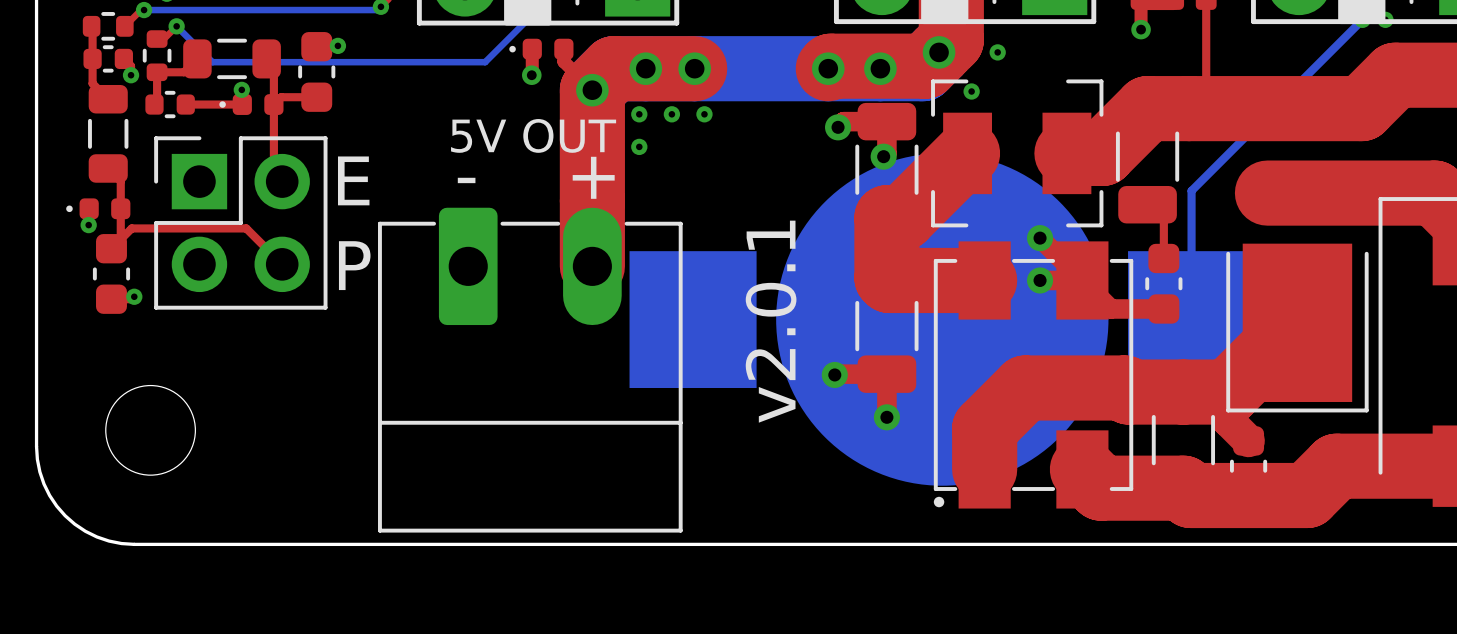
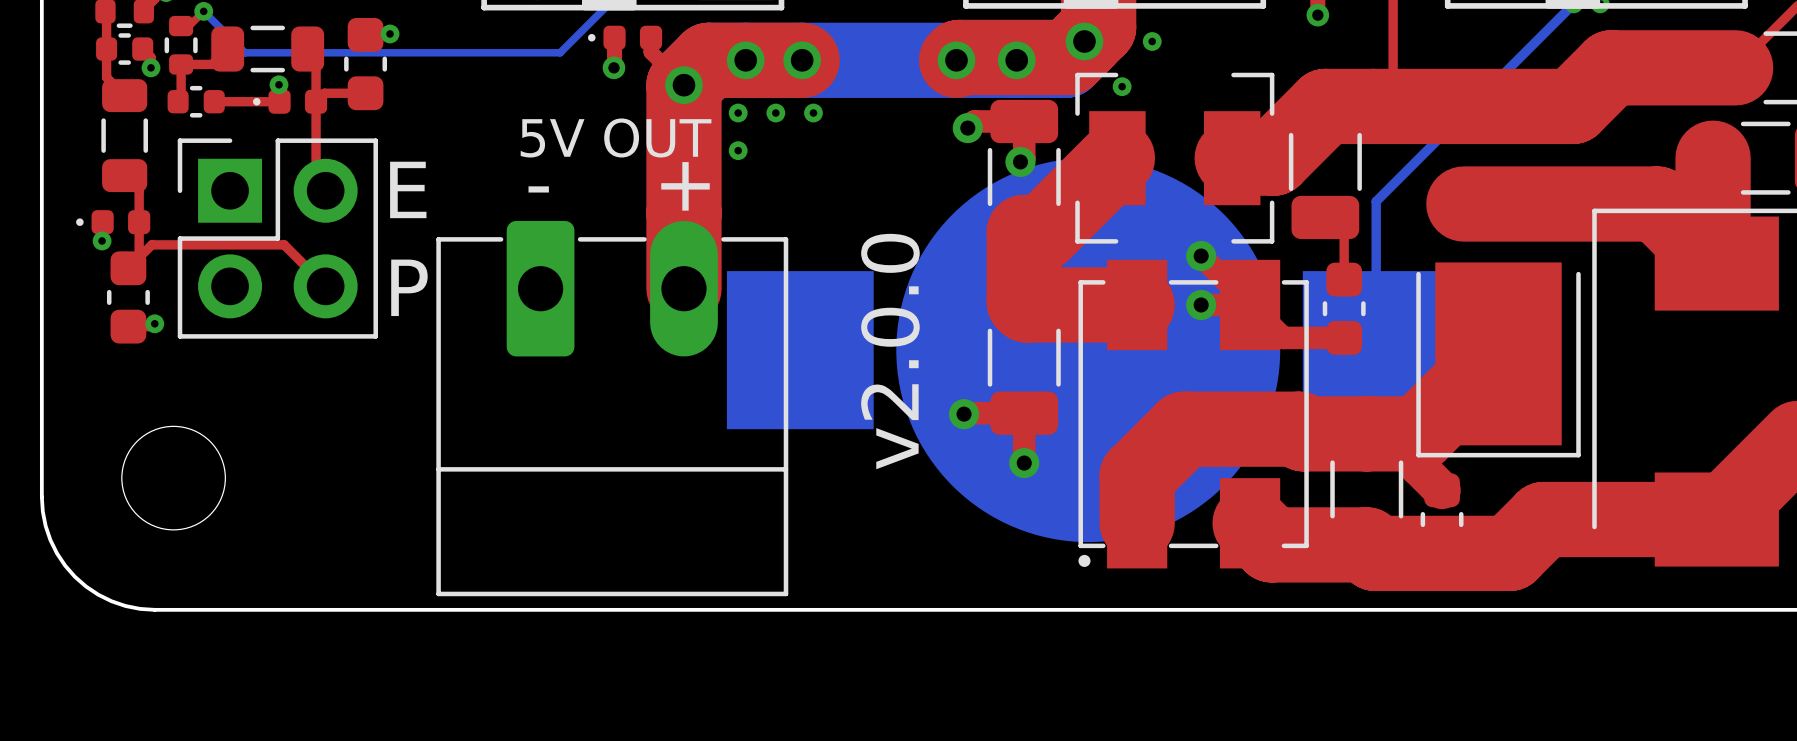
text: v2.0.1 (771, 321) -> v2.0.0 (890, 351)

